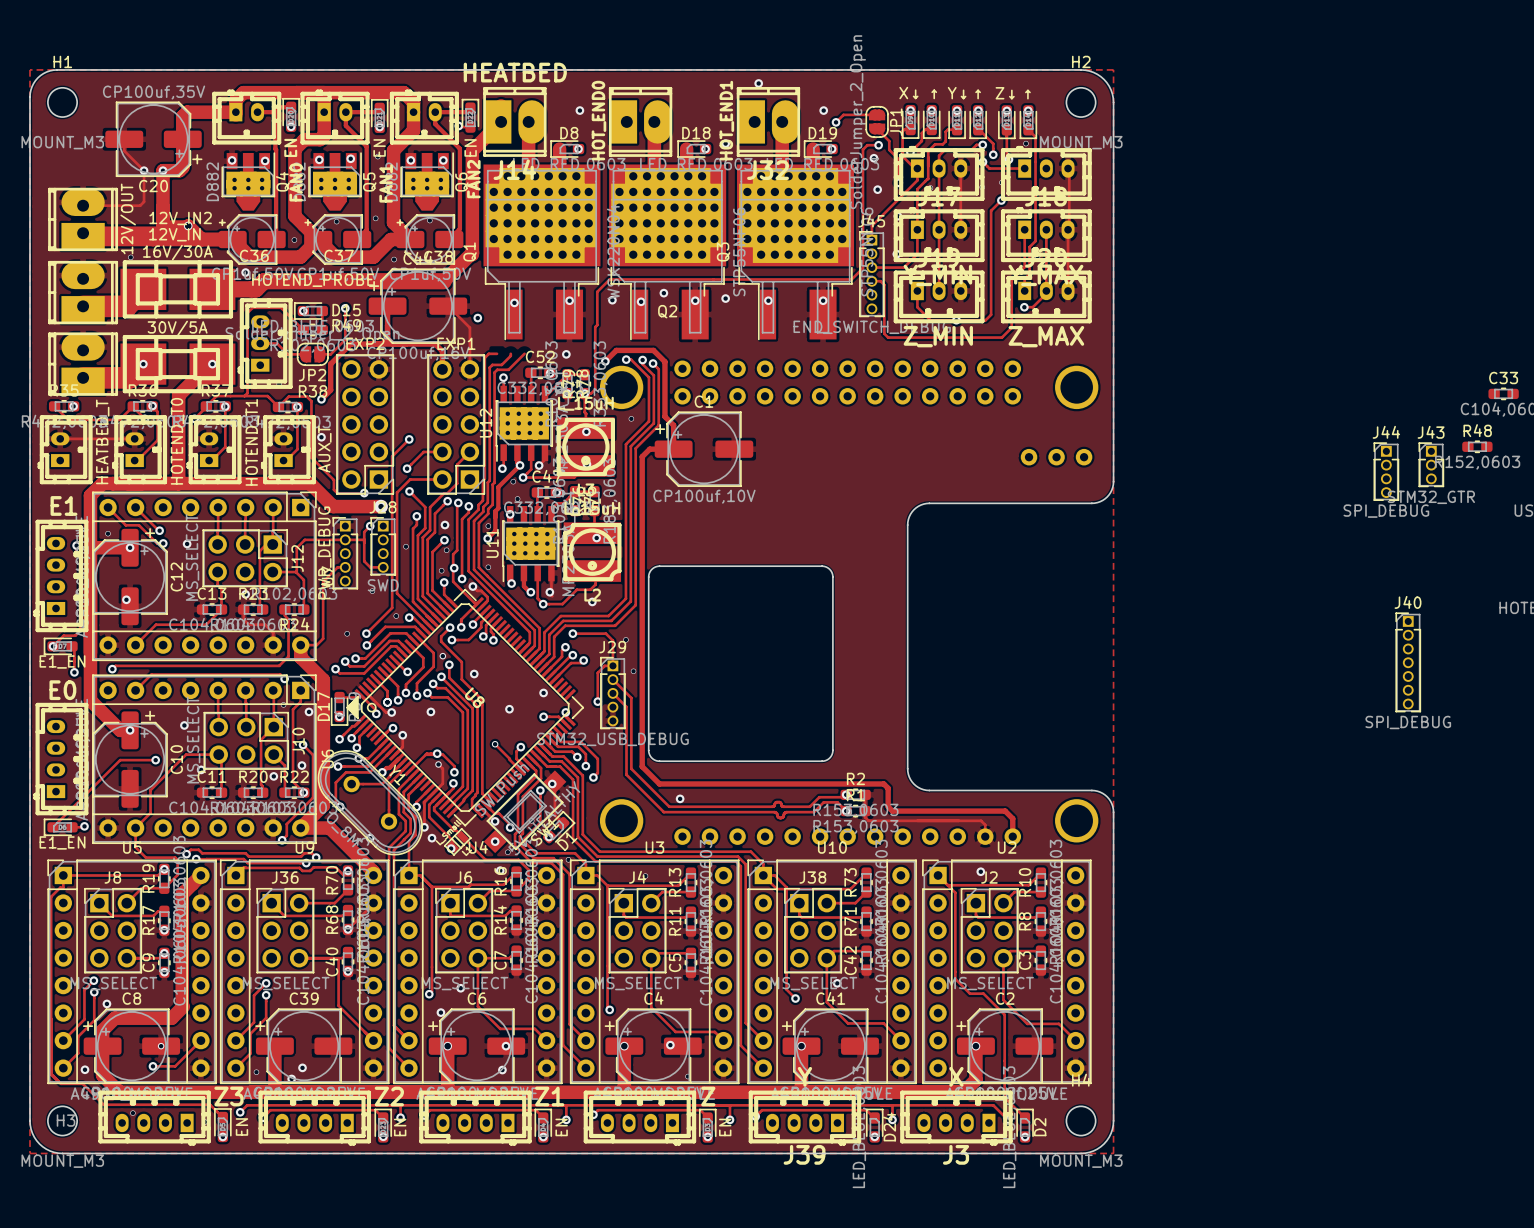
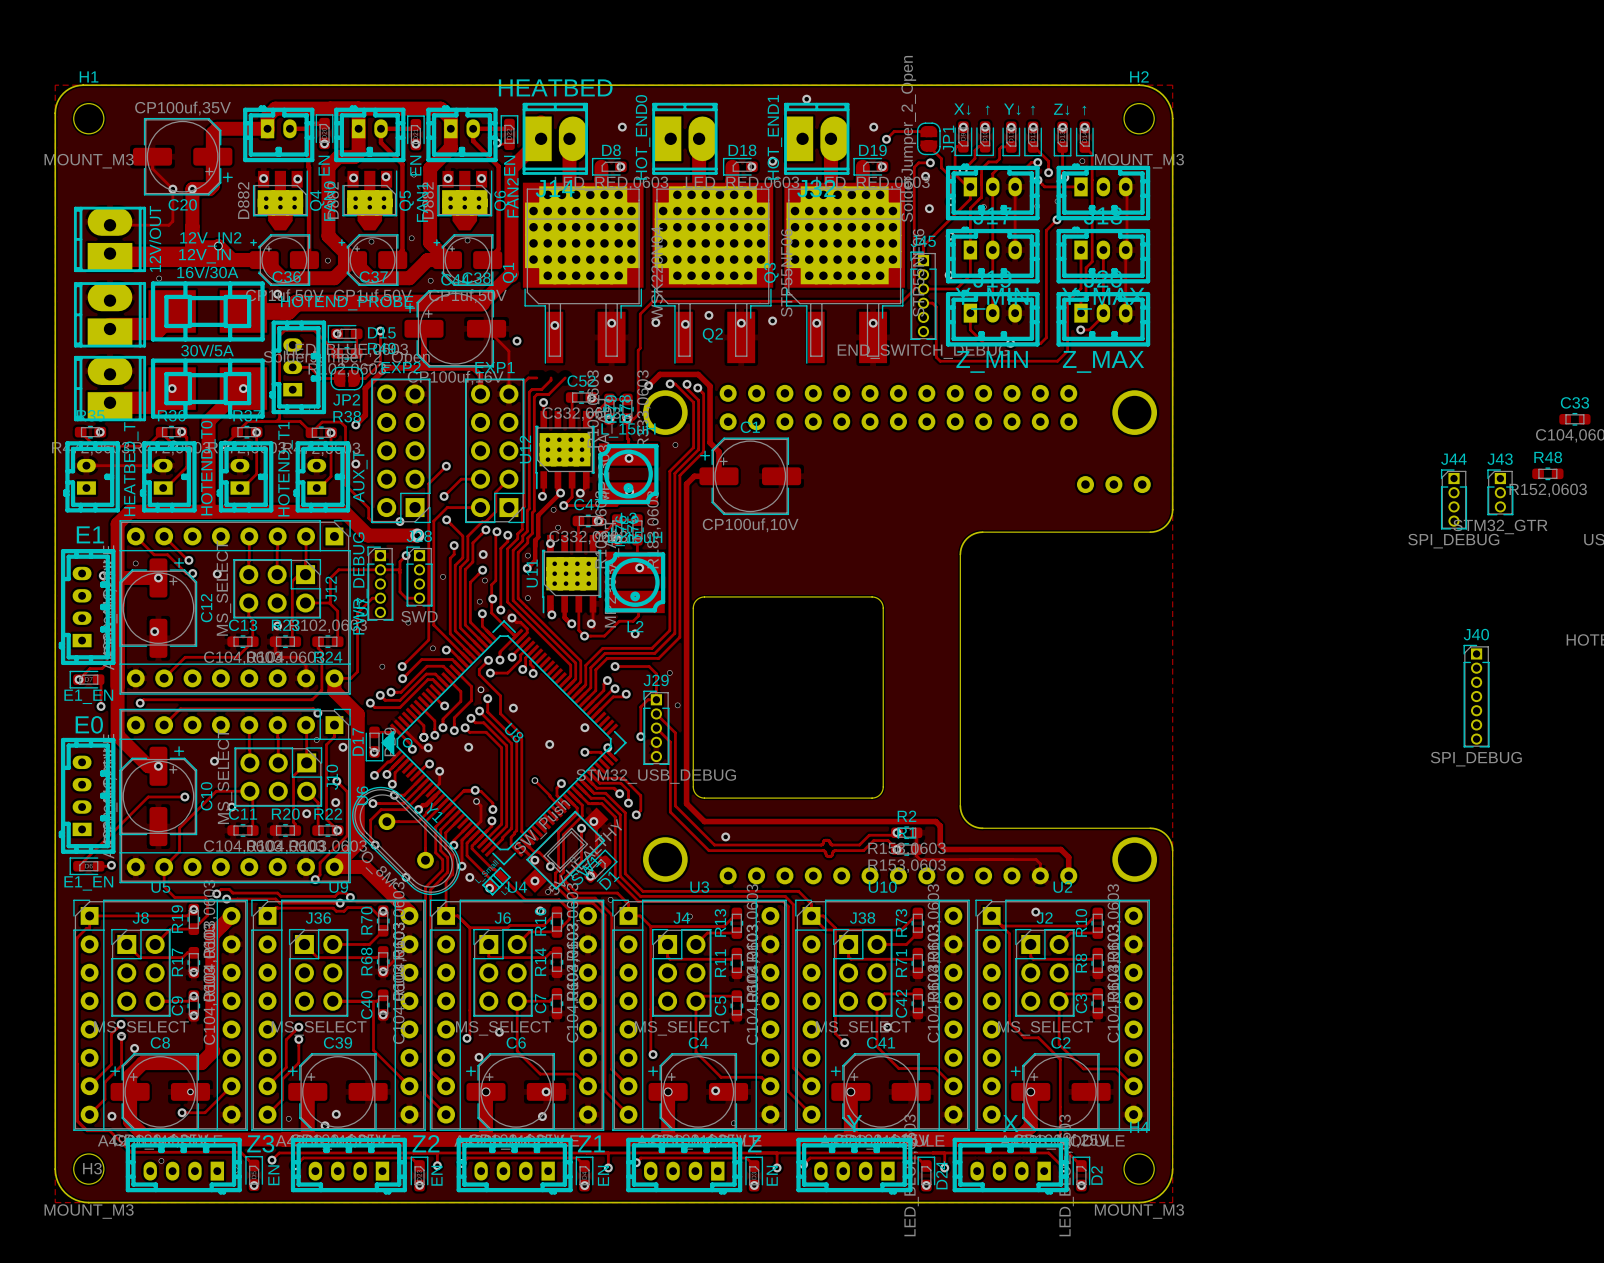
J39 name: J39 (804, 1154) -> none
J3 name: J3 (956, 1154) -> none

